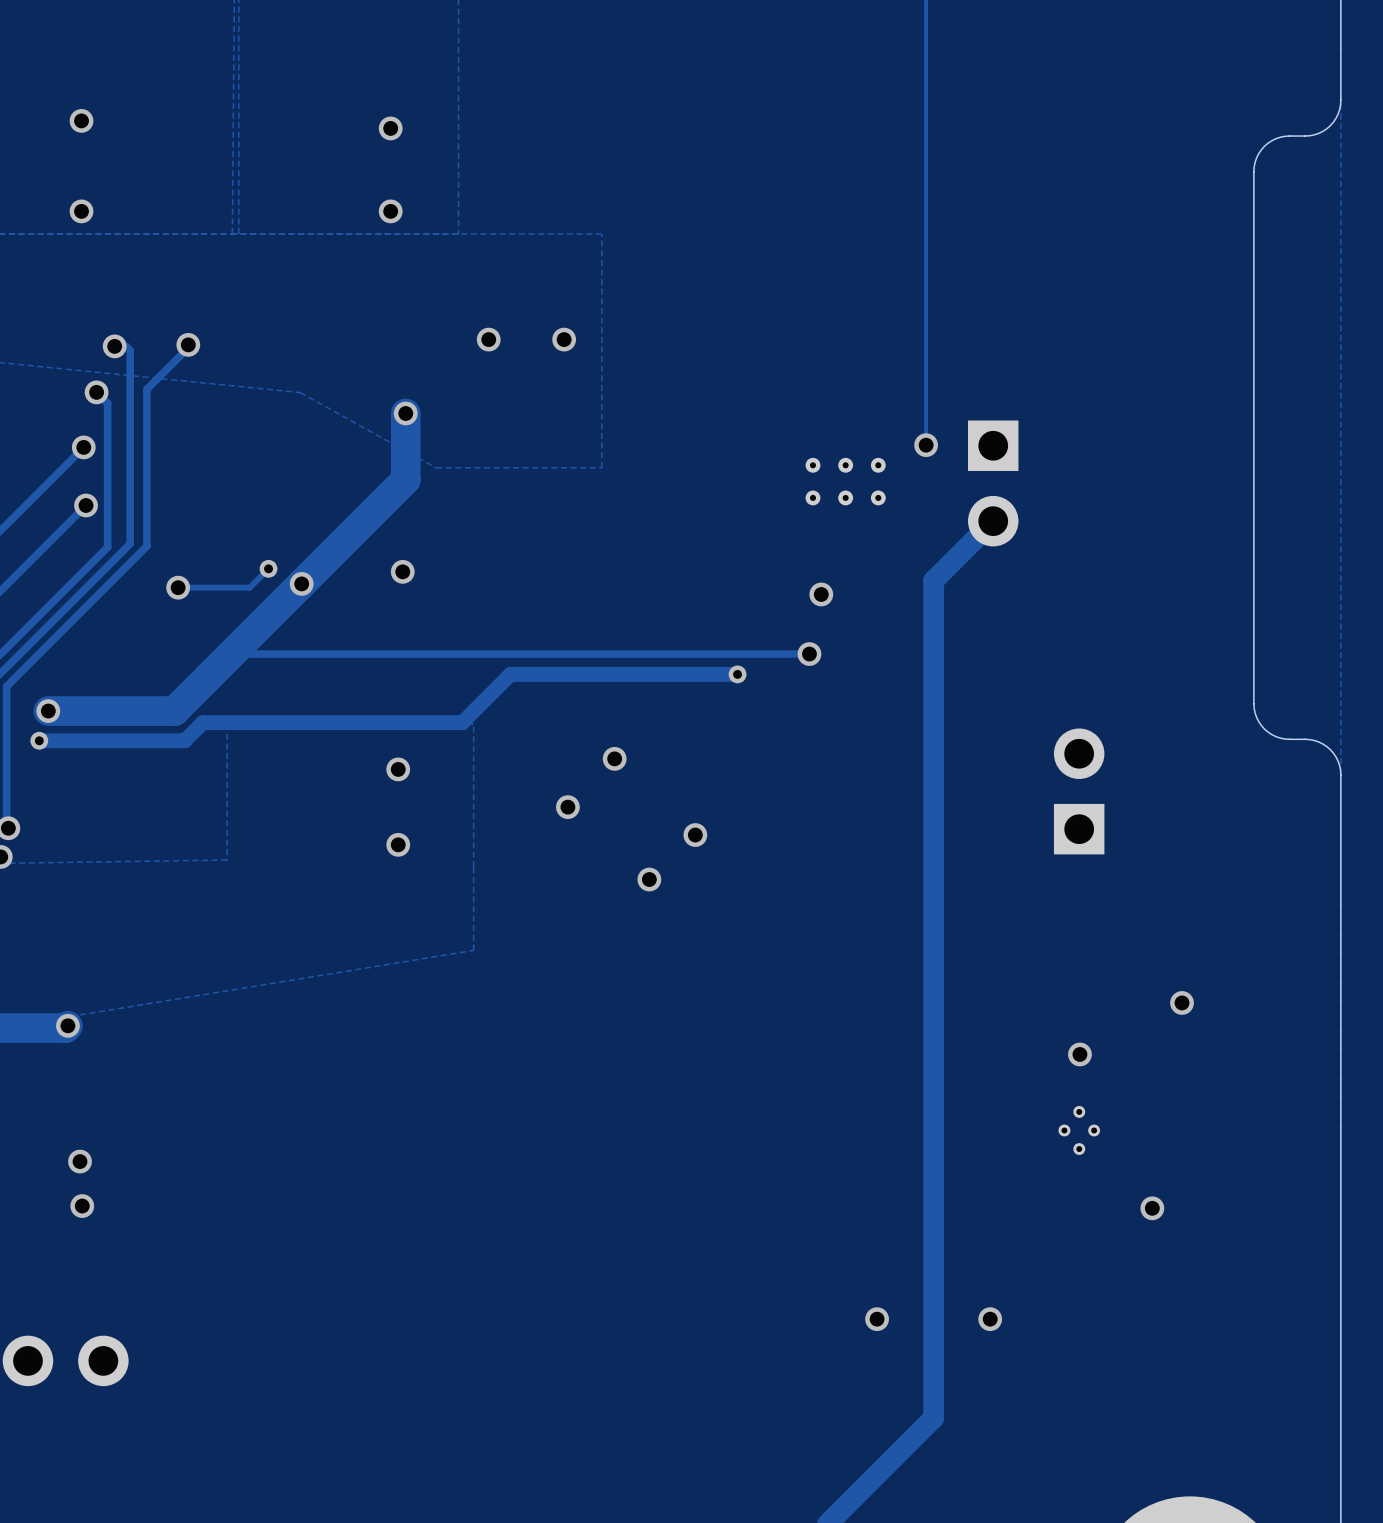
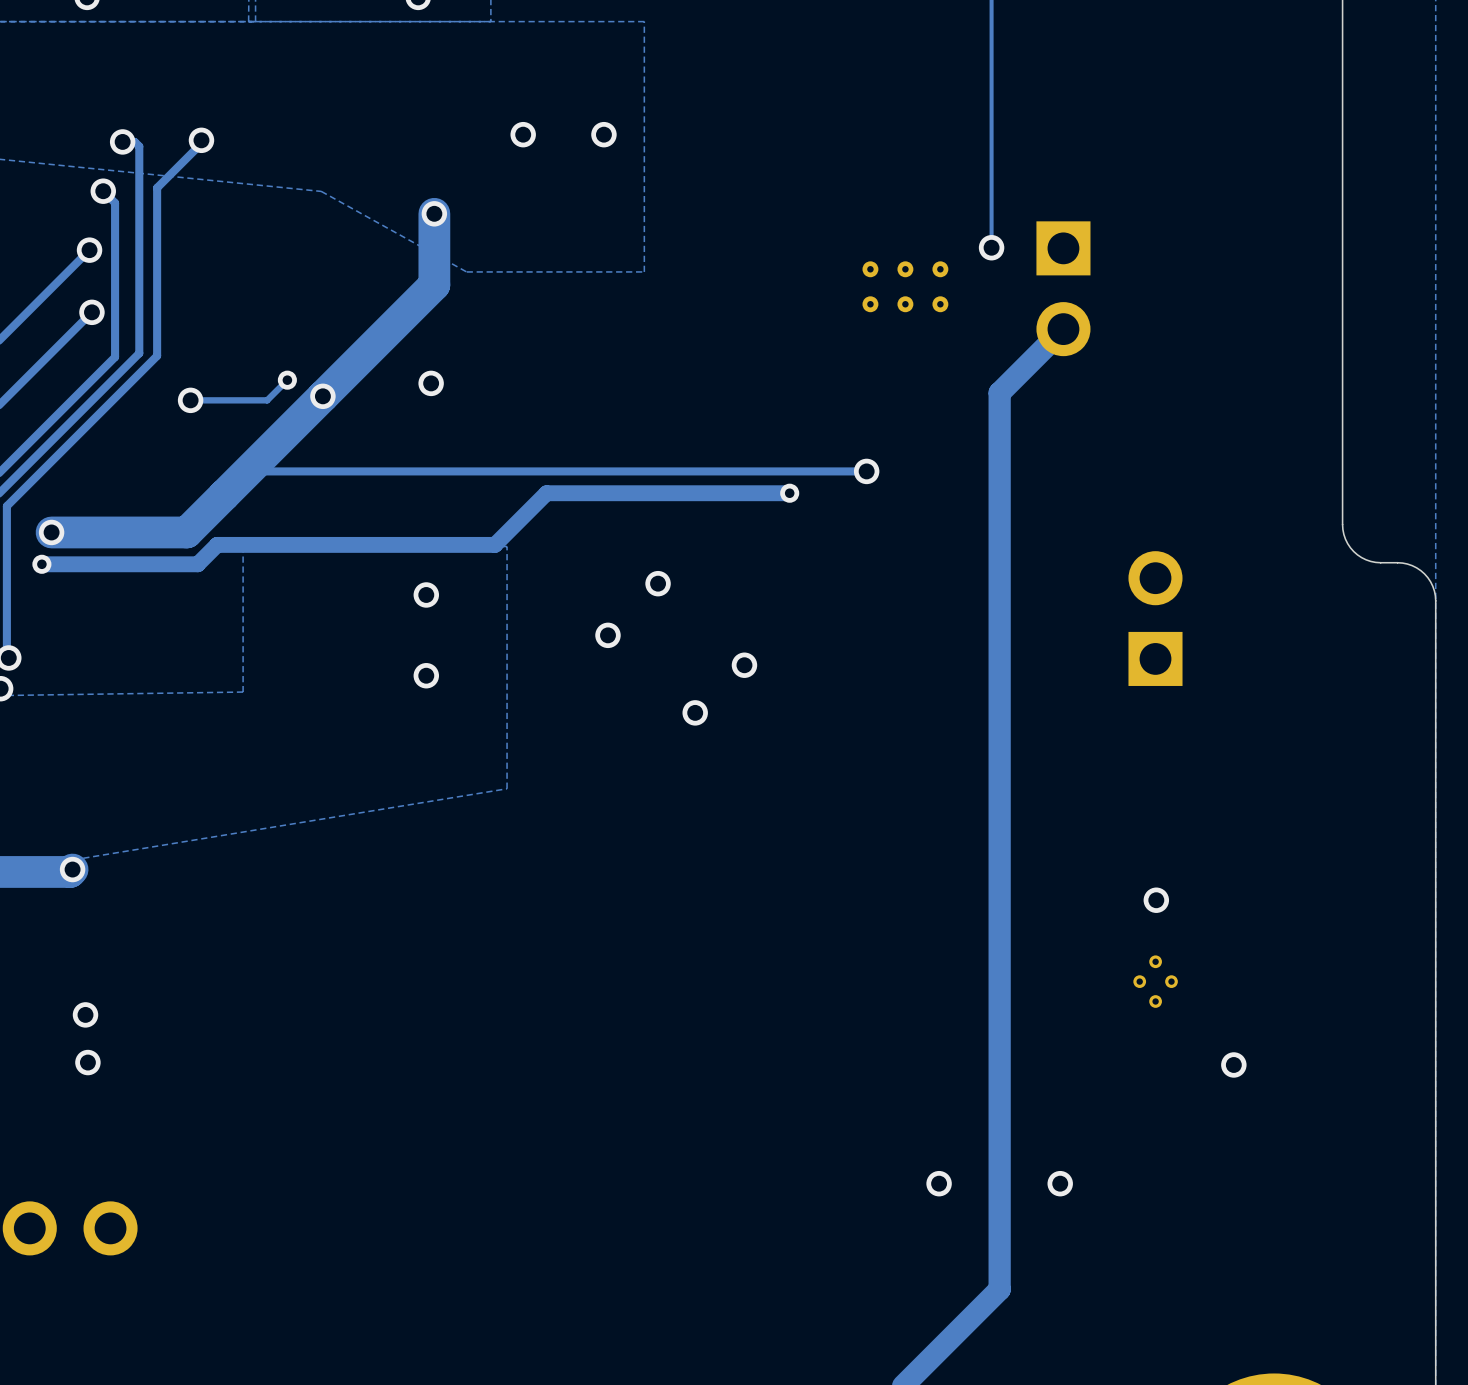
via: (821, 594) -> none
via: (1182, 1002) -> none

